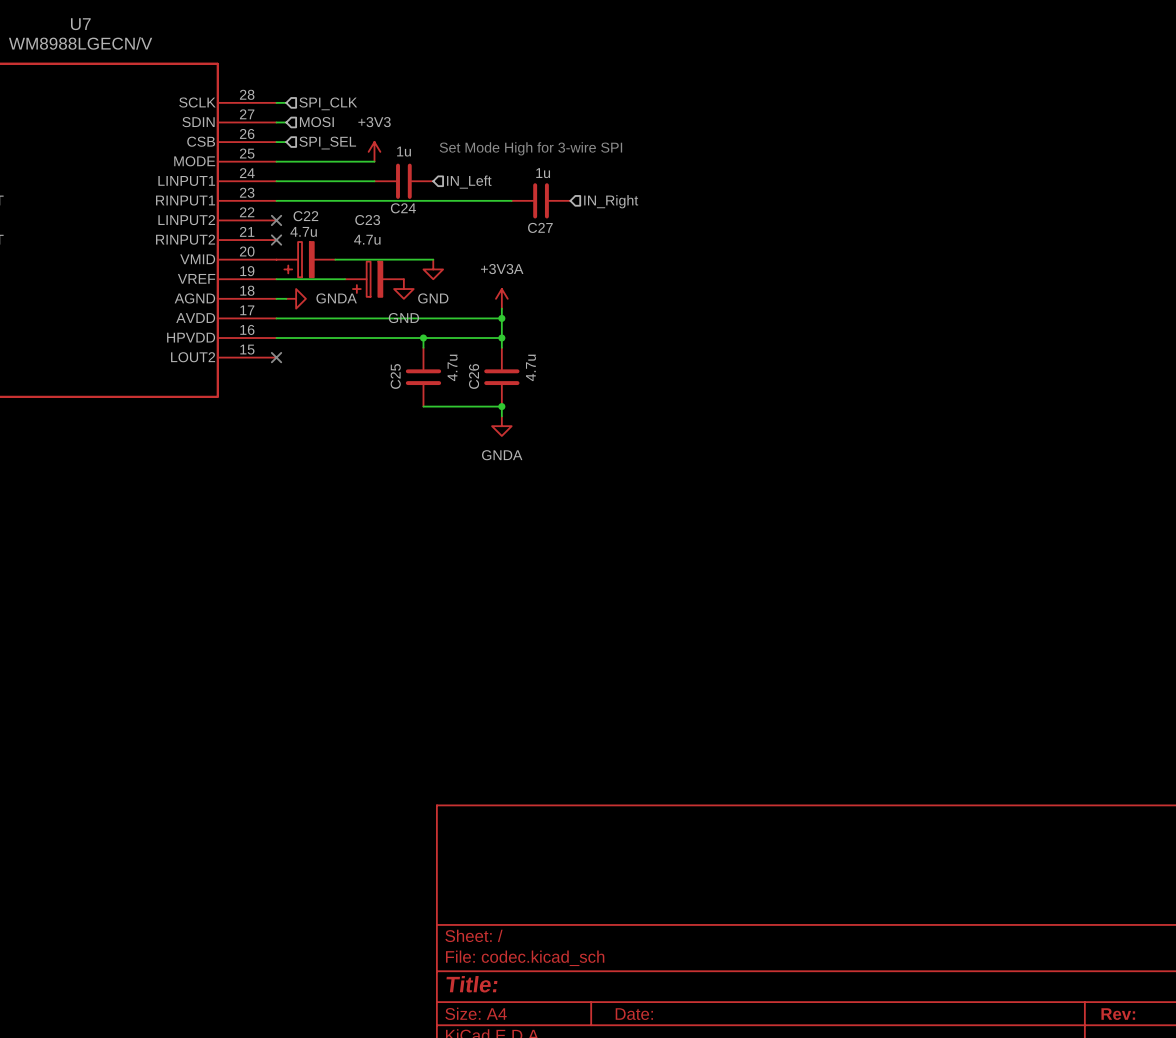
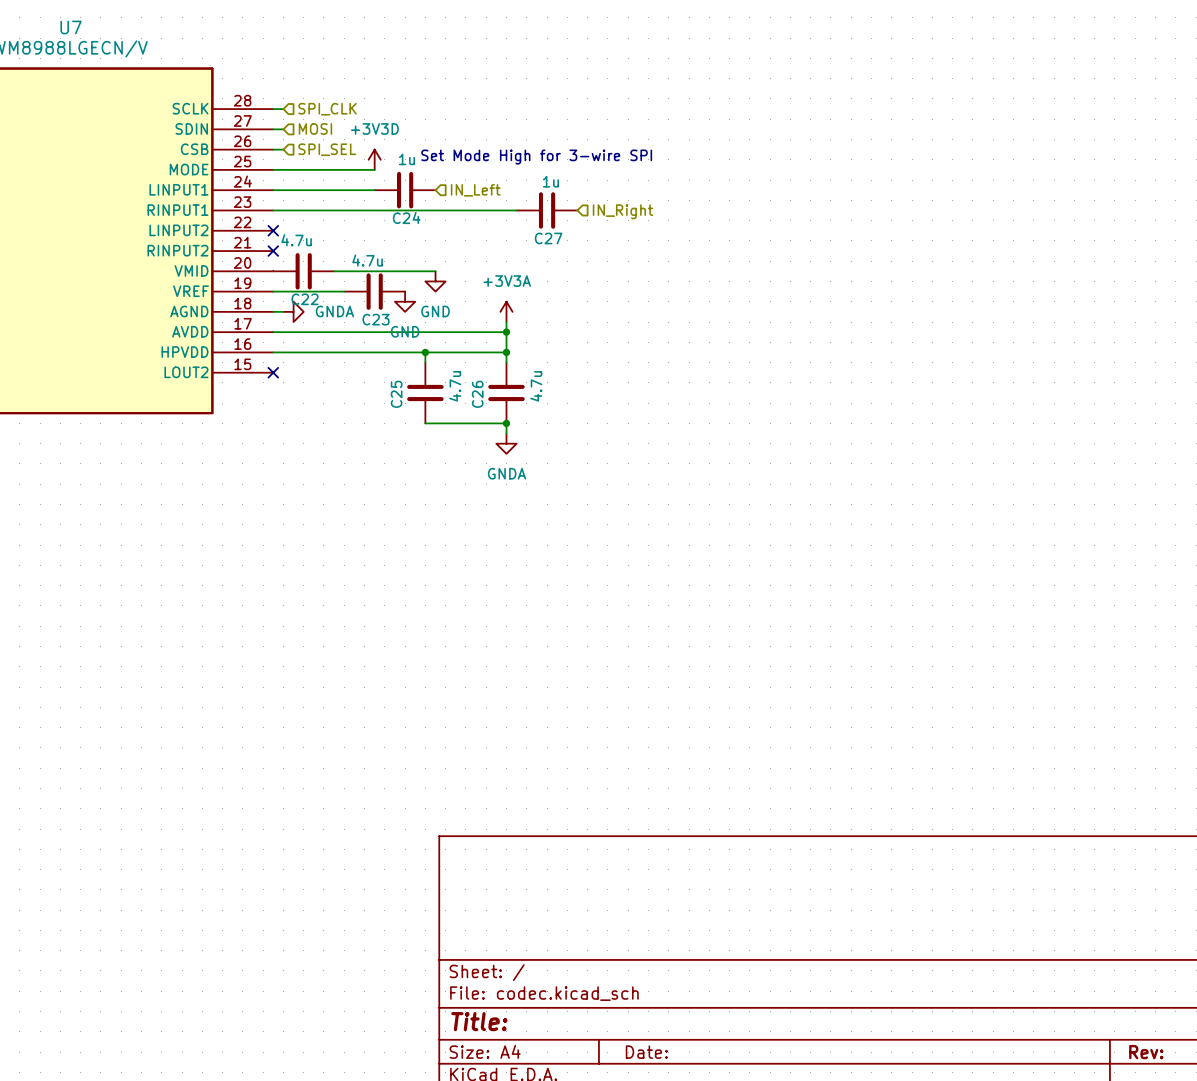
power symbol: +3V3 (374, 151) -> +3V3D (374, 159)
C22 name position: C22 (305, 216) -> C22 (305, 299)
C23 name position: C23 (367, 220) -> C23 (376, 319)
C22 symbol: [276, 242, 336, 278] -> [273, 253, 335, 290]
C23 symbol: [345, 261, 404, 297] -> [344, 273, 406, 310]

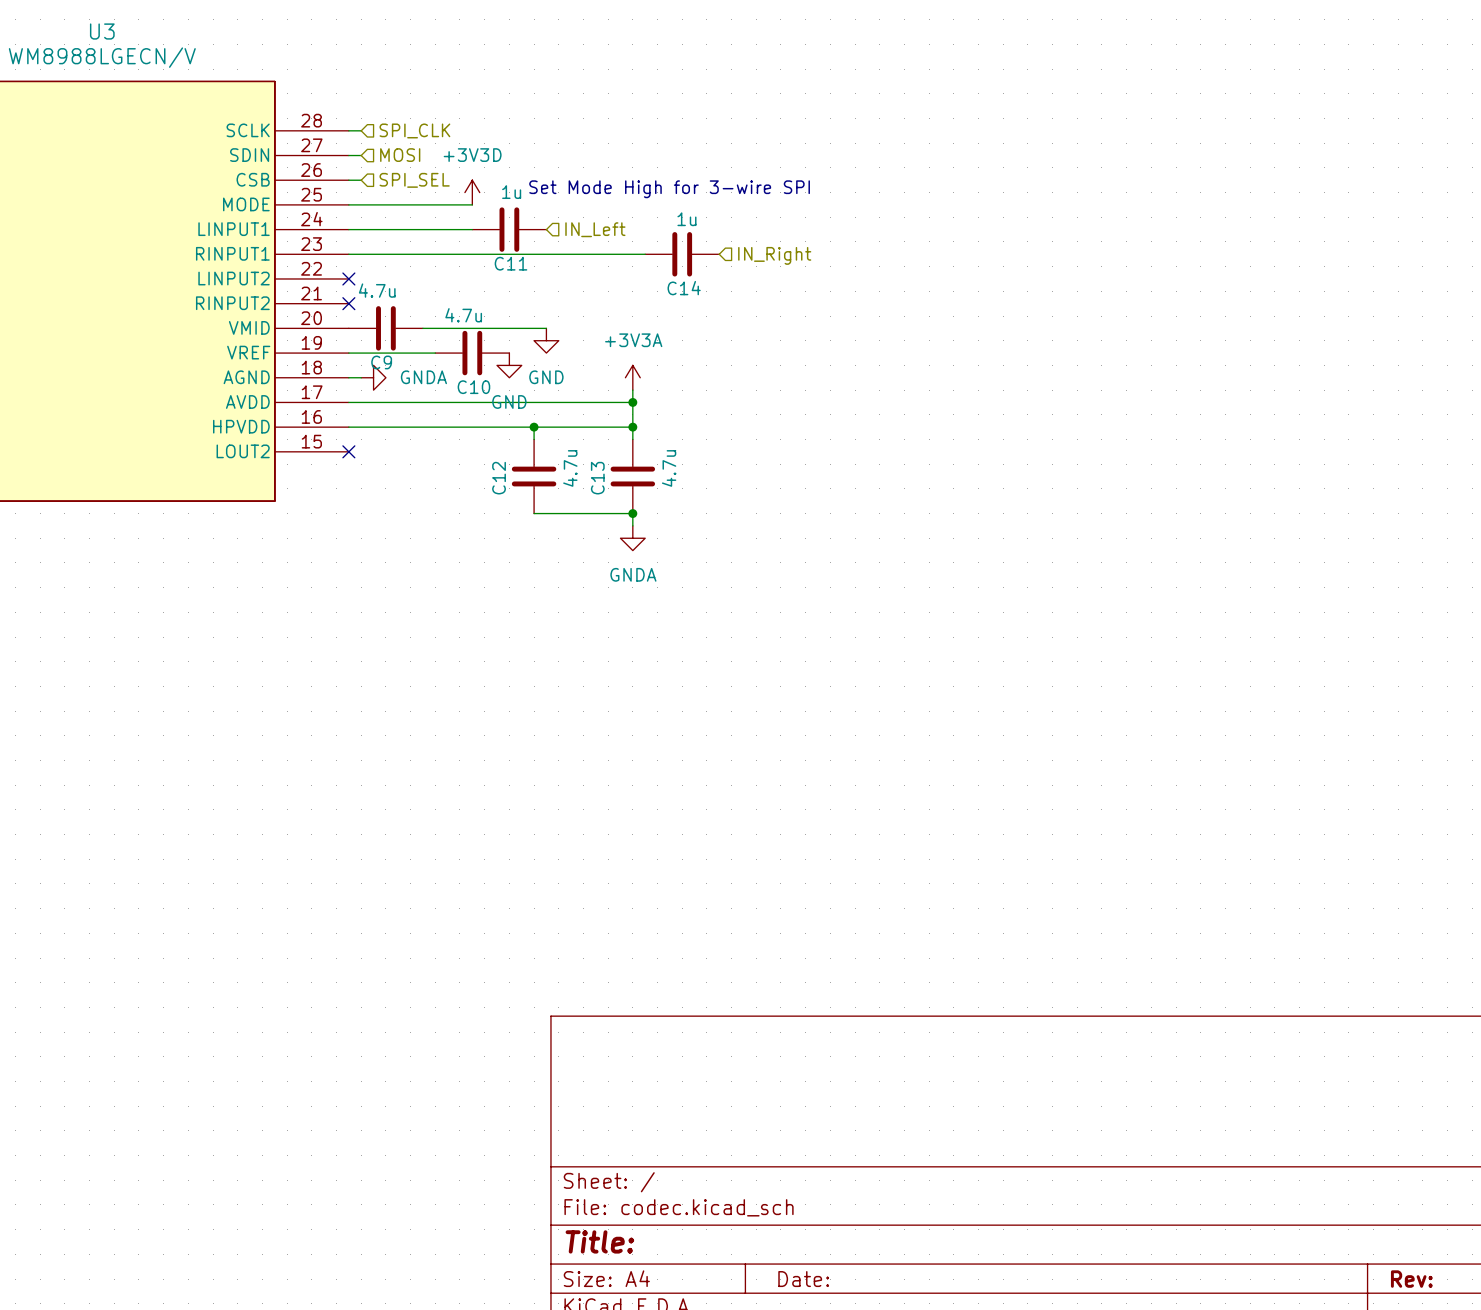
U7 name: U7 (71, 27) -> U3 (102, 31)
C24 name: C24 (406, 217) -> C11 (510, 263)
C27 name: C27 (548, 238) -> C14 (684, 288)
C22 name: C22 (305, 299) -> C9 (381, 362)
C23 name: C23 (376, 319) -> C10 (473, 387)
C25 name: C25 (396, 394) -> C12 (499, 478)
C26 name: C26 (477, 394) -> C13 (597, 478)

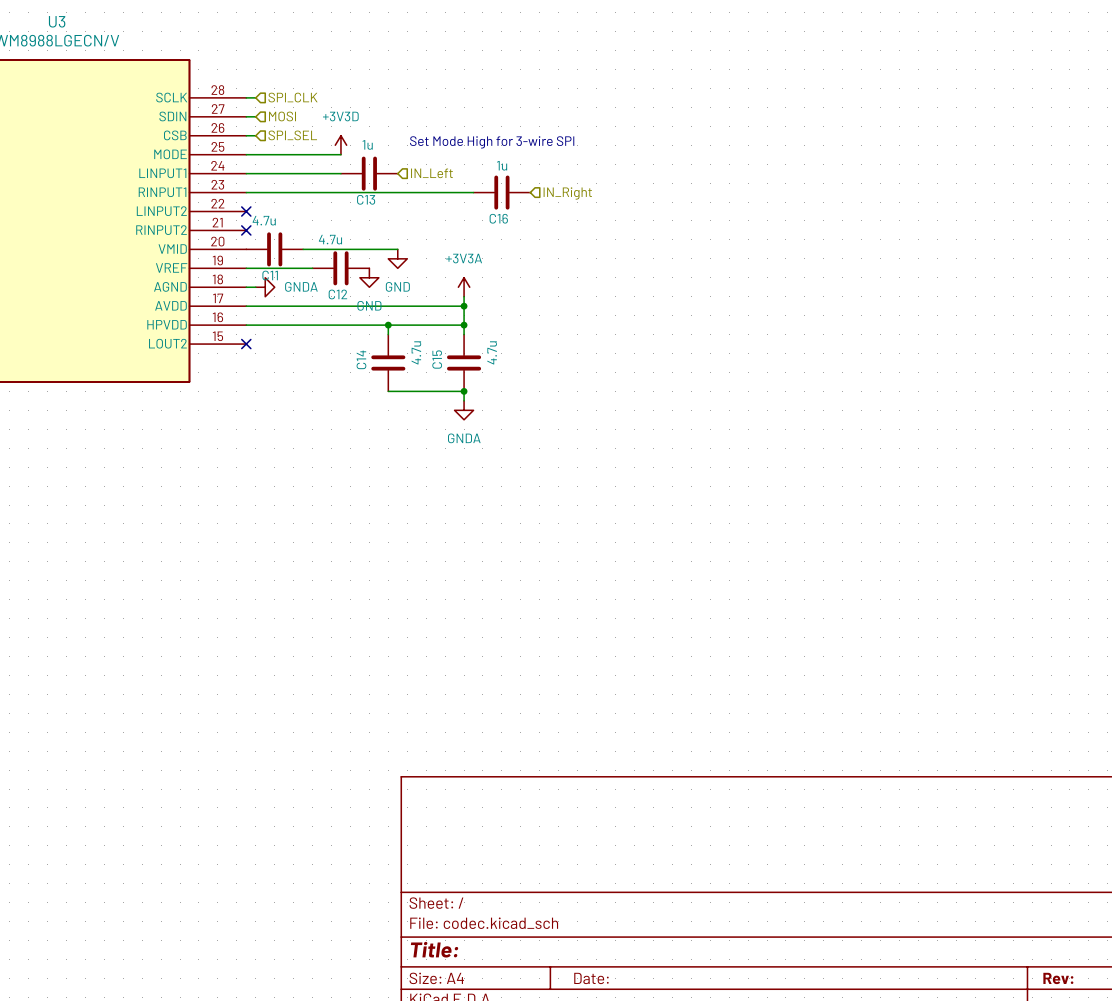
C11 name: C11 (510, 263) -> C13 (366, 199)
C14 name: C14 (684, 288) -> C16 (498, 218)
C9 name: C9 (381, 362) -> C11 (270, 275)
C10 name: C10 (473, 387) -> C12 (337, 294)
C12 name: C12 (499, 478) -> C14 (361, 359)
C13 name: C13 (597, 478) -> C15 (437, 359)

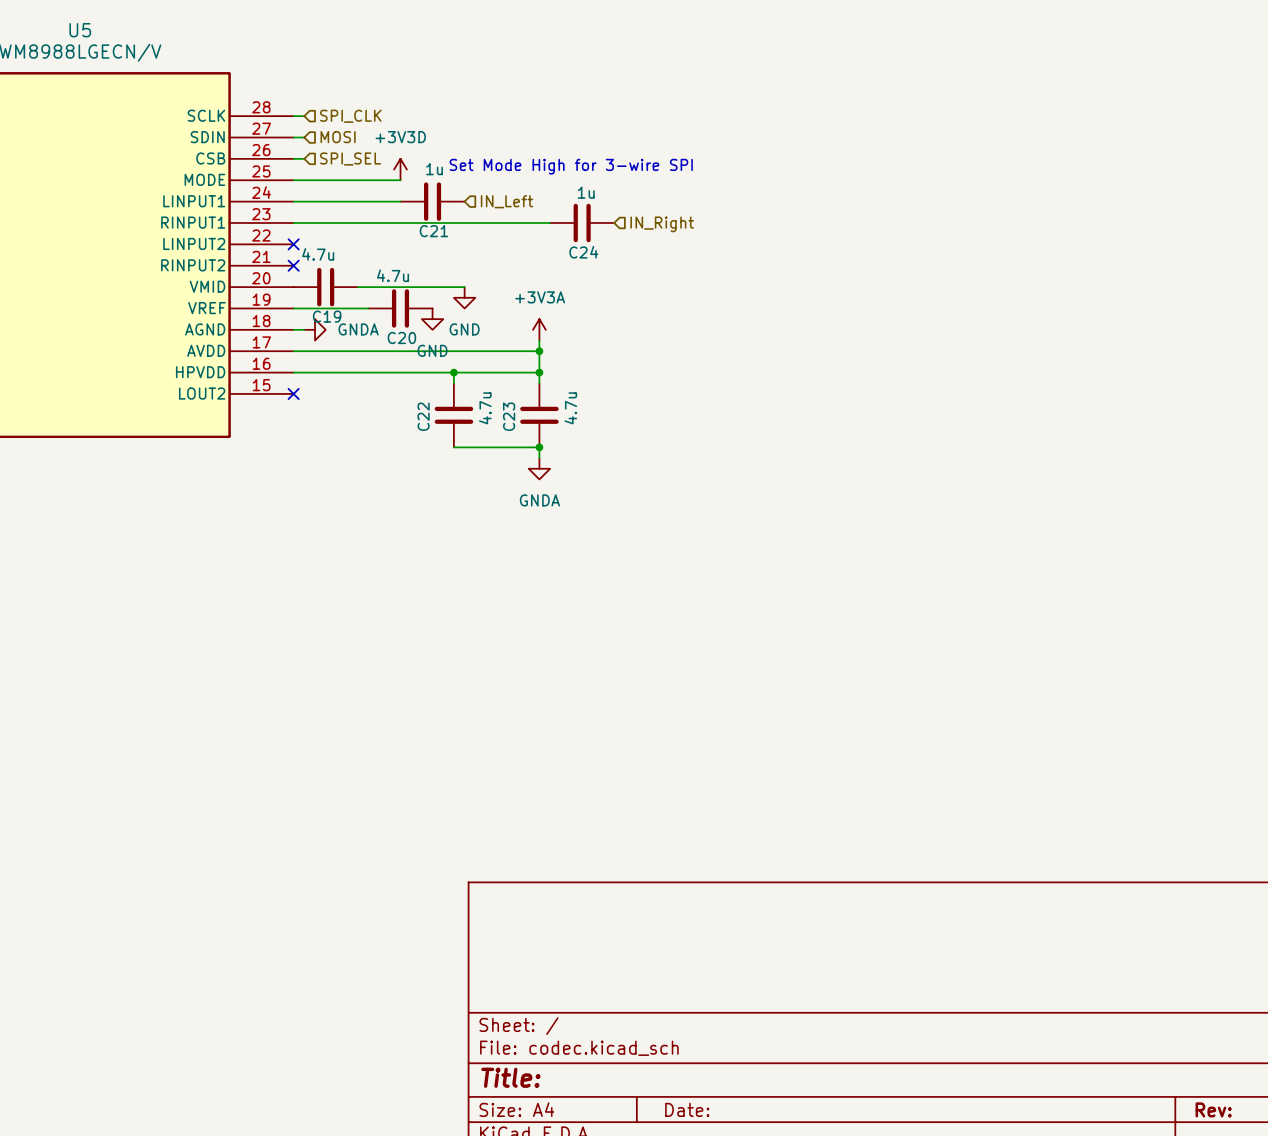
U3 name: U3 (57, 21) -> U5 (80, 30)
C13 name: C13 (366, 199) -> C21 (433, 231)
C16 name: C16 (498, 218) -> C24 (583, 252)
C11 name: C11 (270, 275) -> C19 (327, 316)
C12 name: C12 (337, 294) -> C20 (401, 337)
C14 name: C14 (361, 359) -> C22 (423, 416)
C15 name: C15 (437, 359) -> C23 (509, 416)

